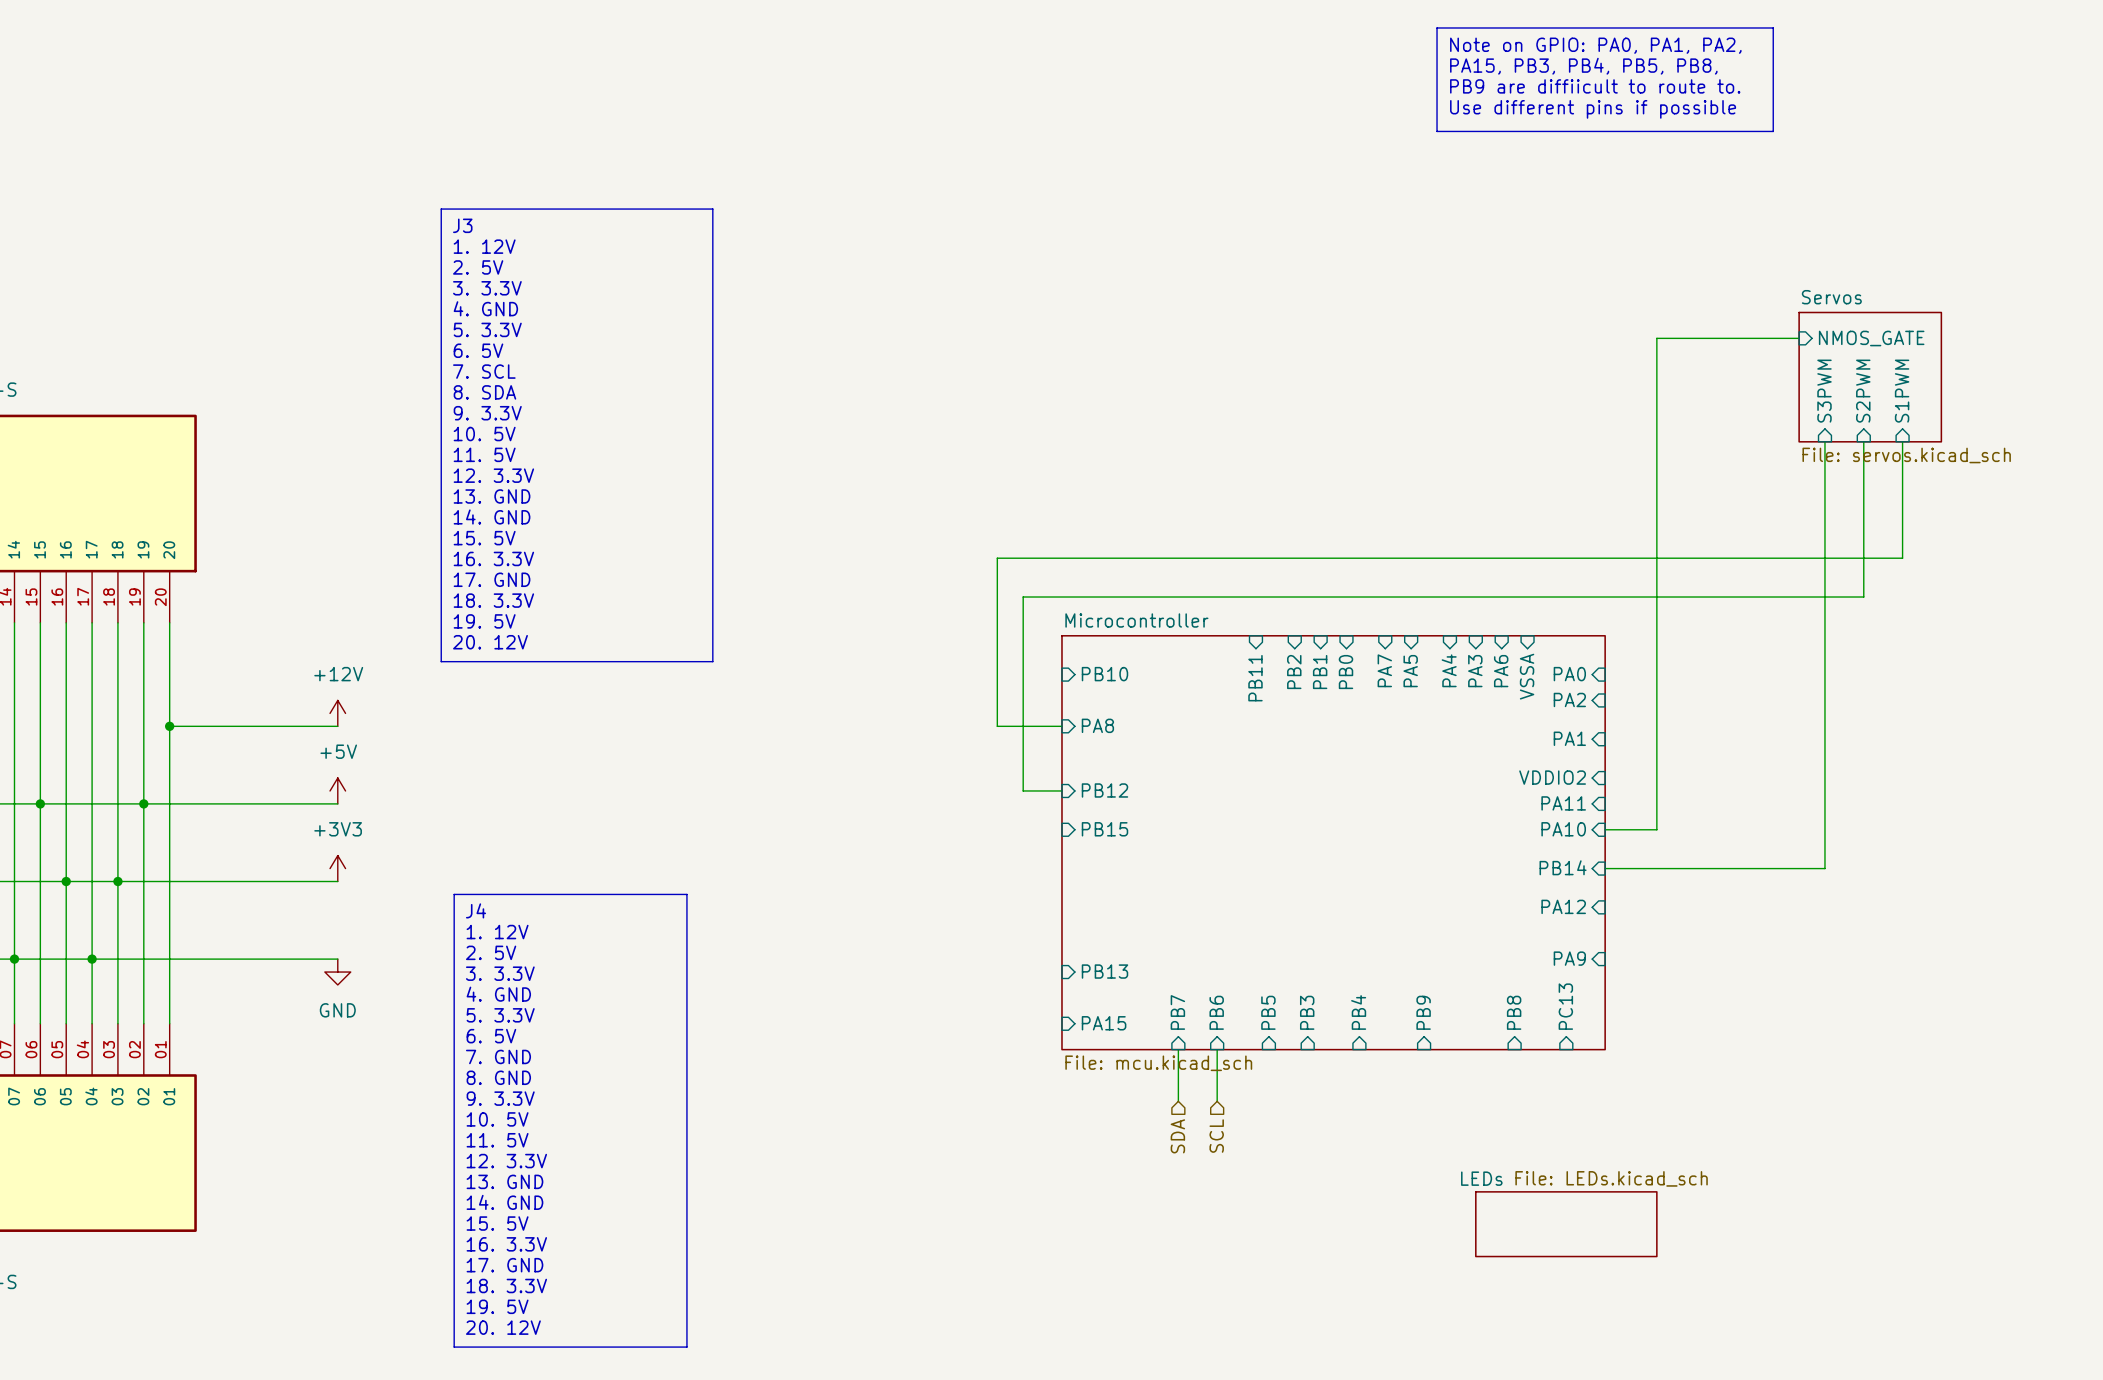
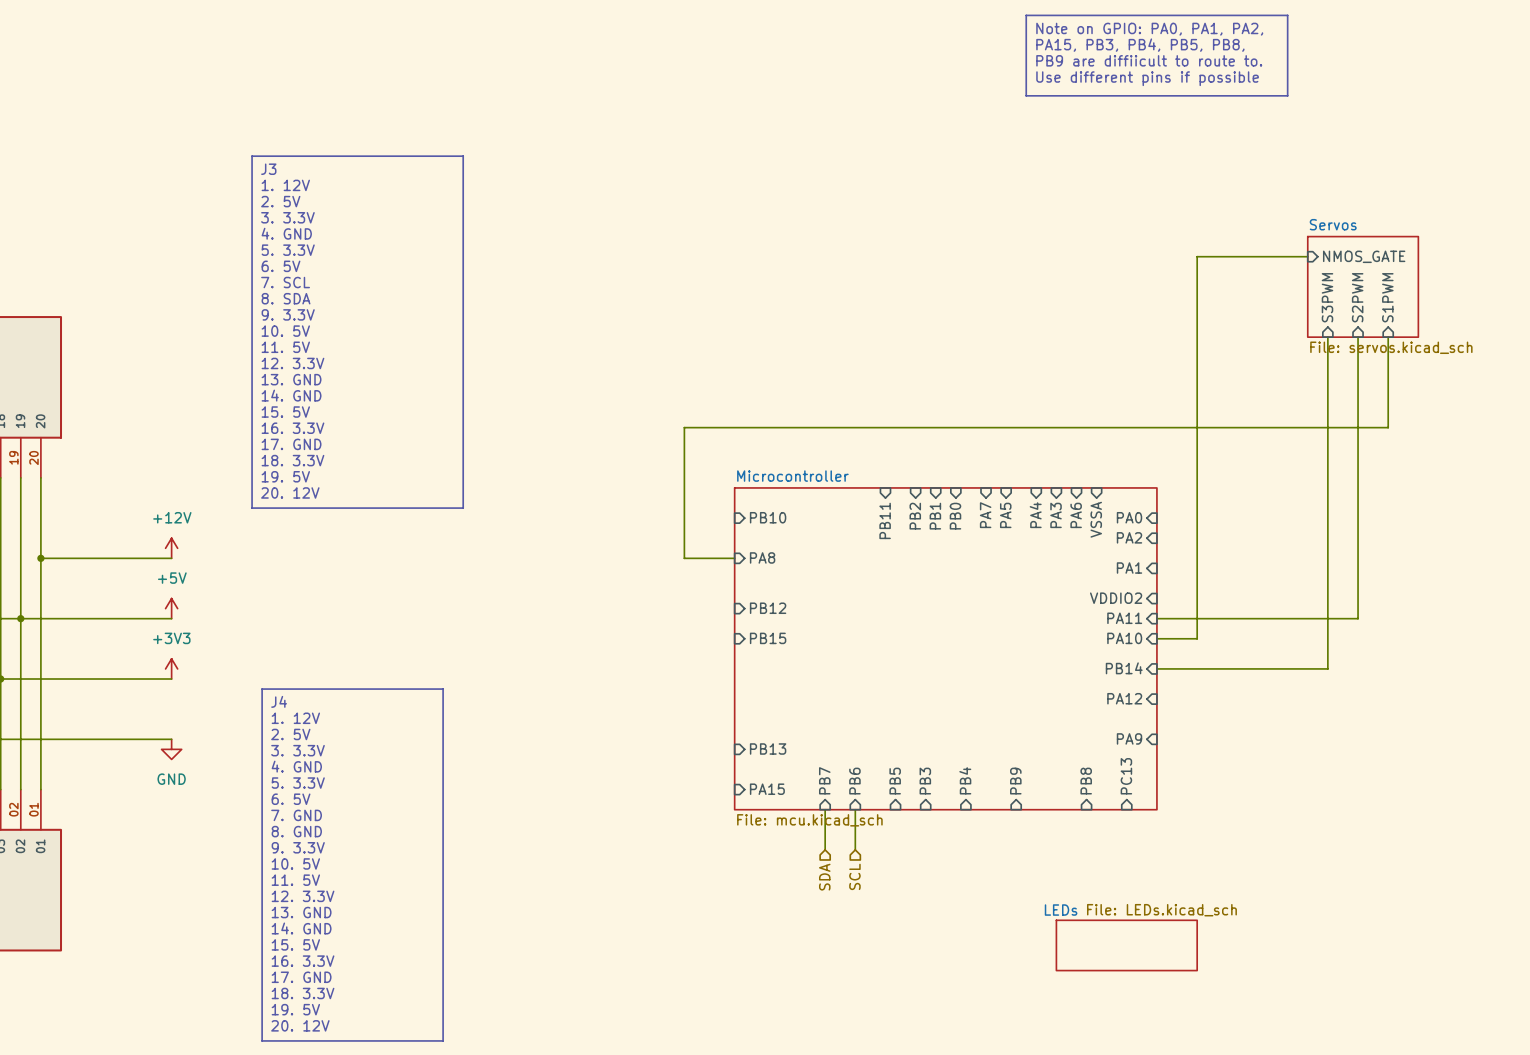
wire: (1863, 597) (1023, 597) (1023, 790) (1061, 790) -> (1358, 457) (1358, 618) (1156, 618)

